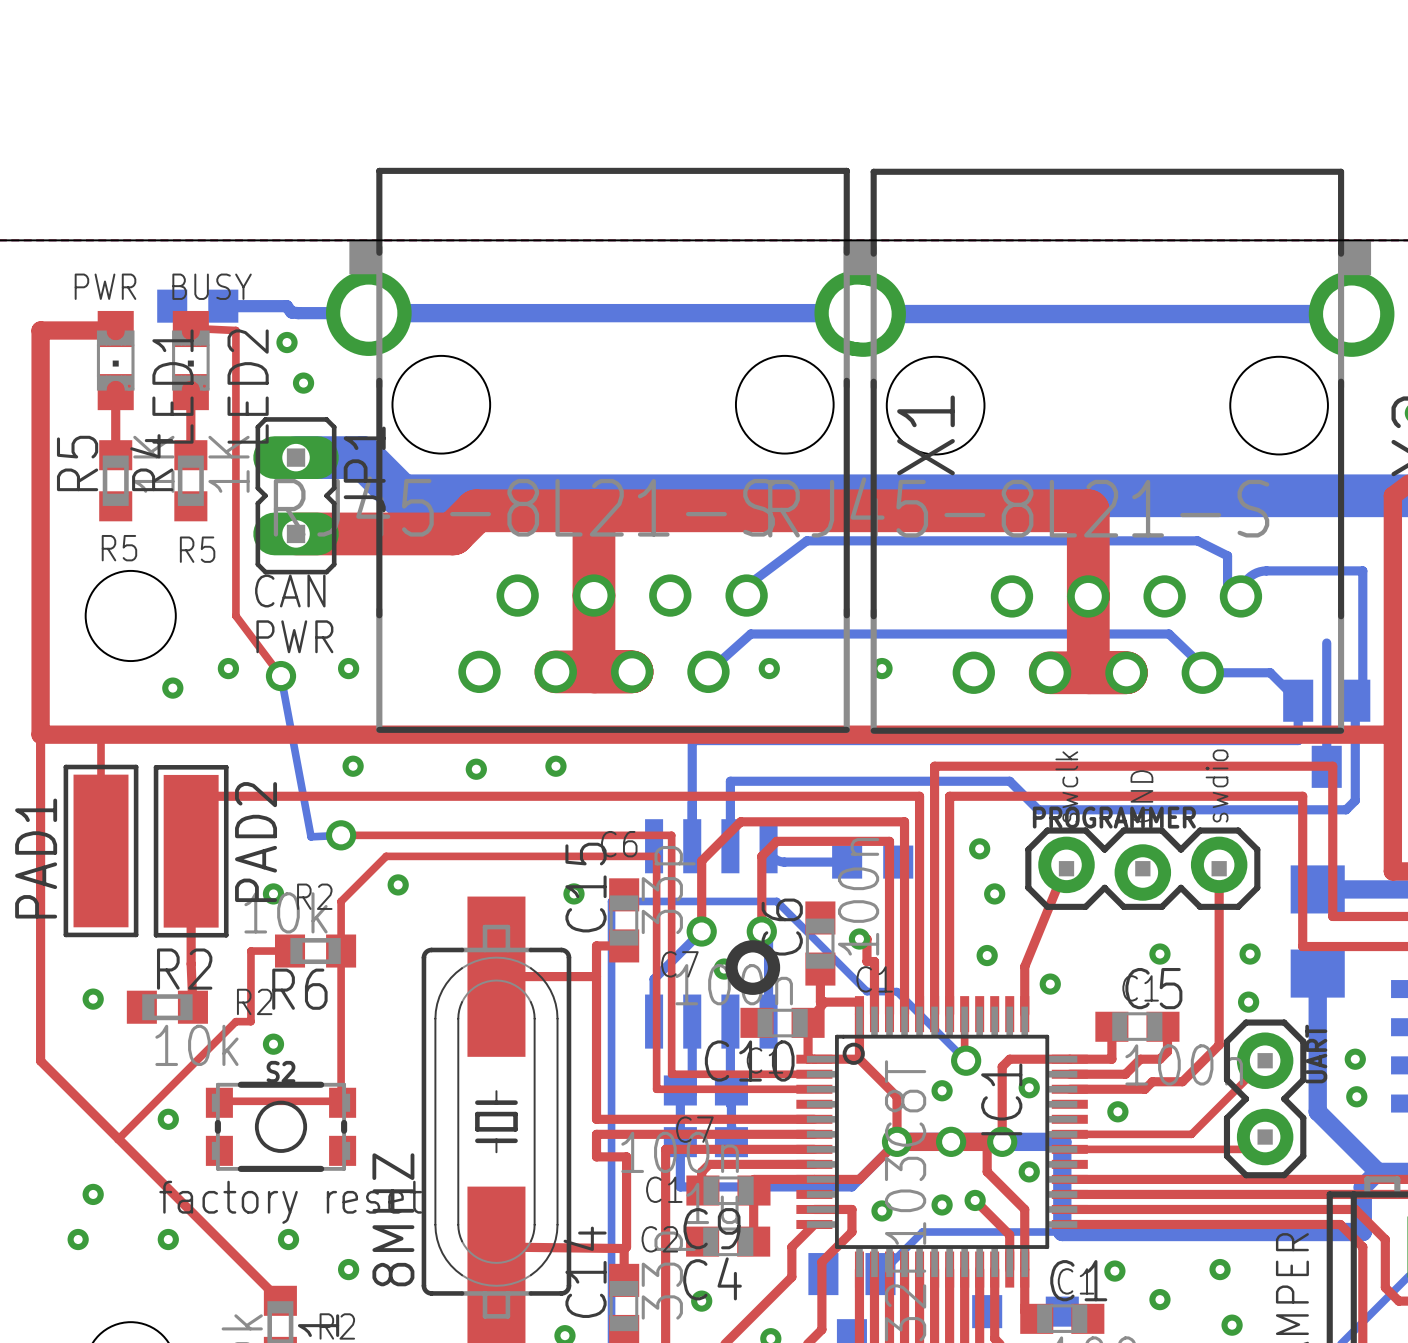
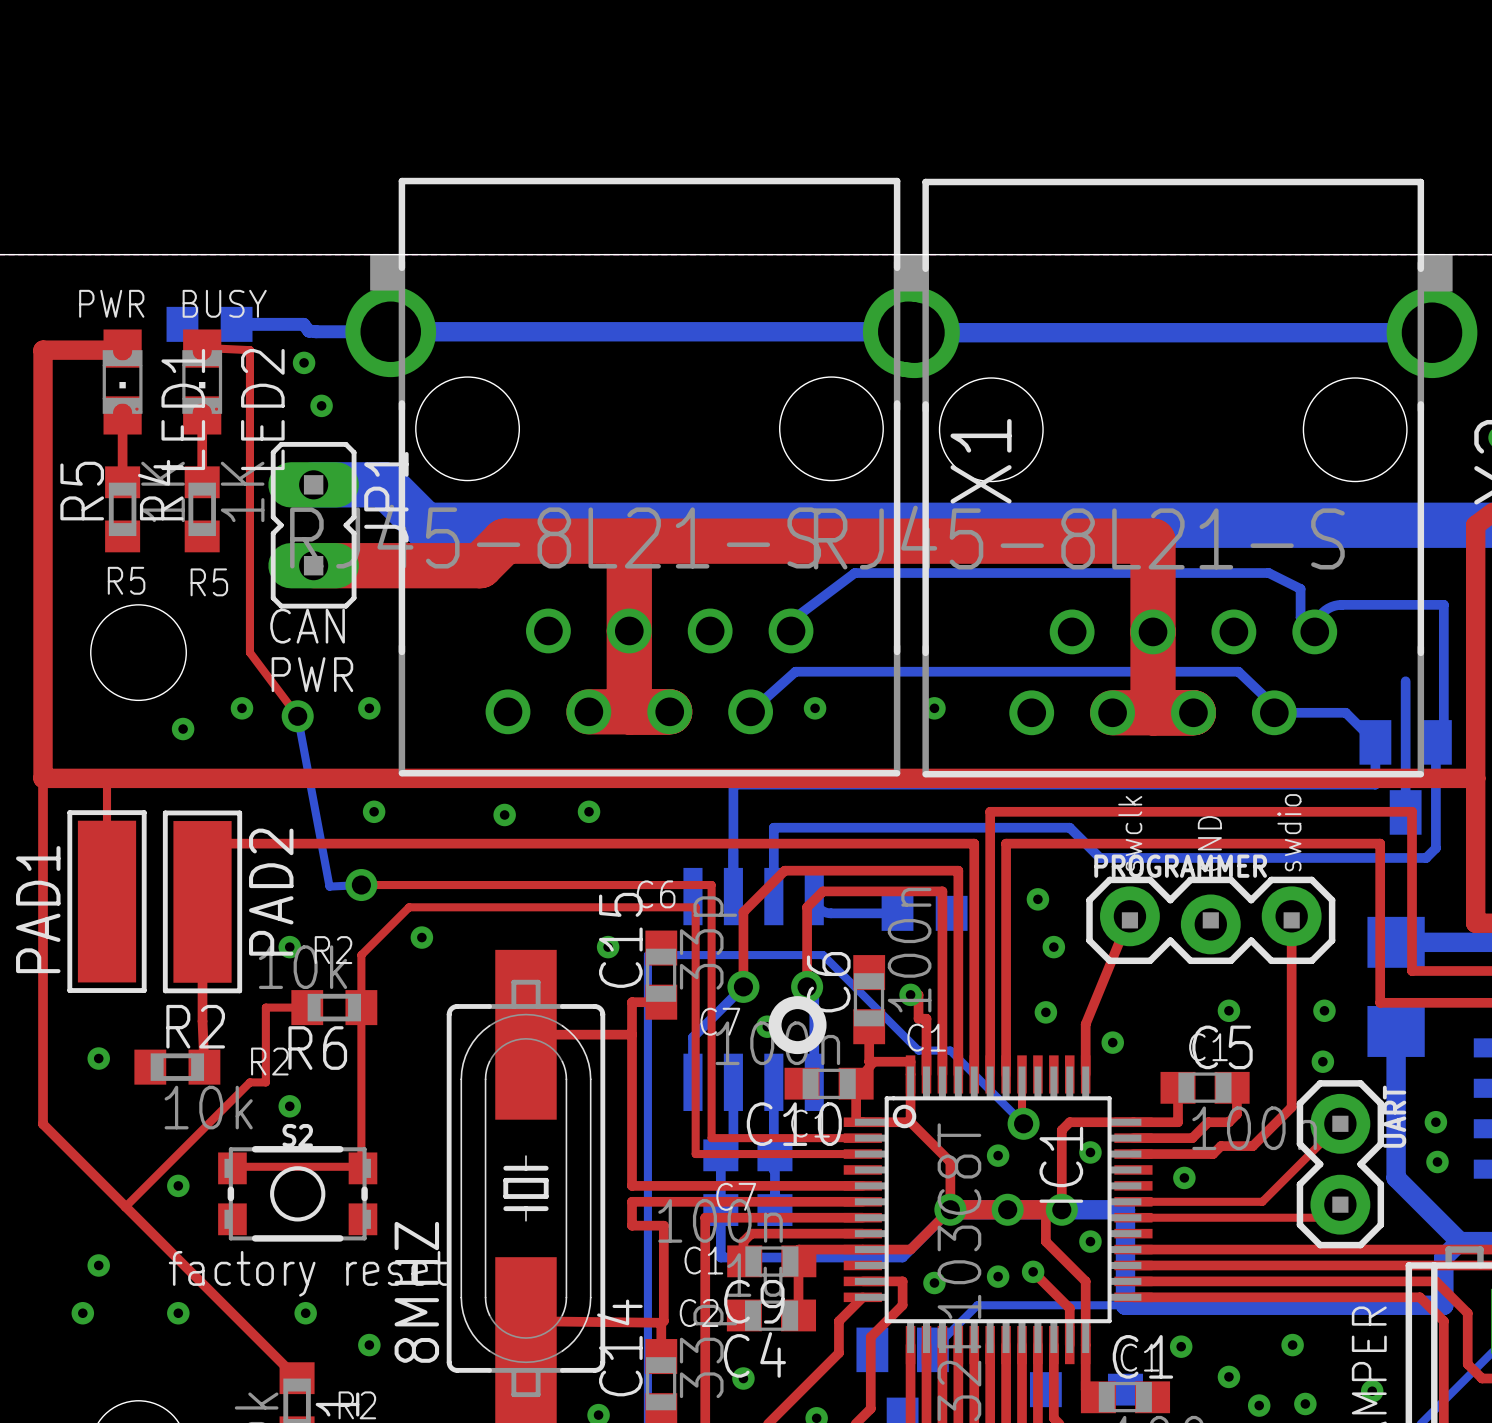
via: none -> (1372, 1391)
via: none -> (1259, 1405)

